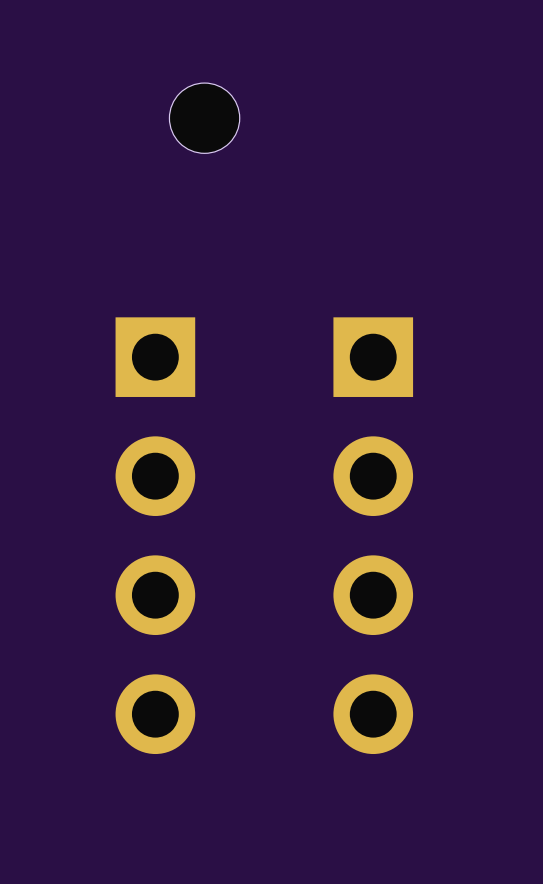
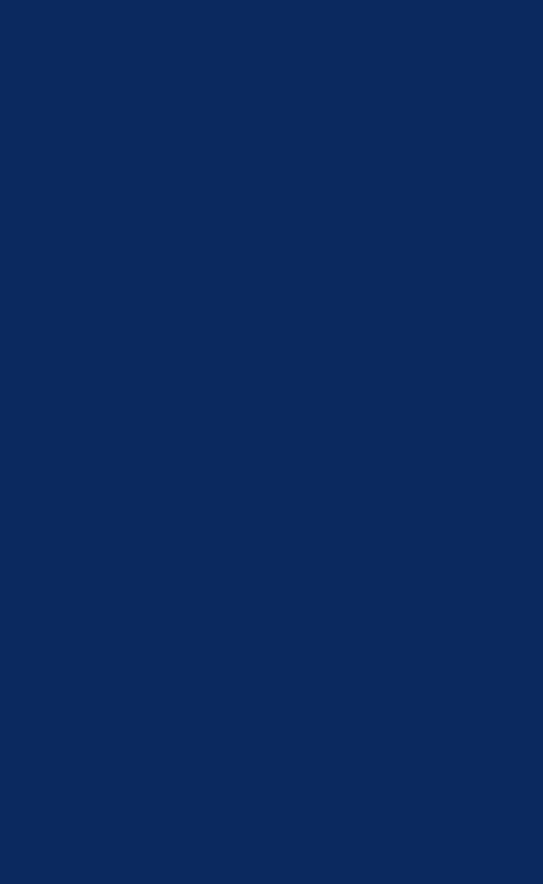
part: (204, 118) -> none
part: (155, 535) -> none
part: (373, 535) -> none

